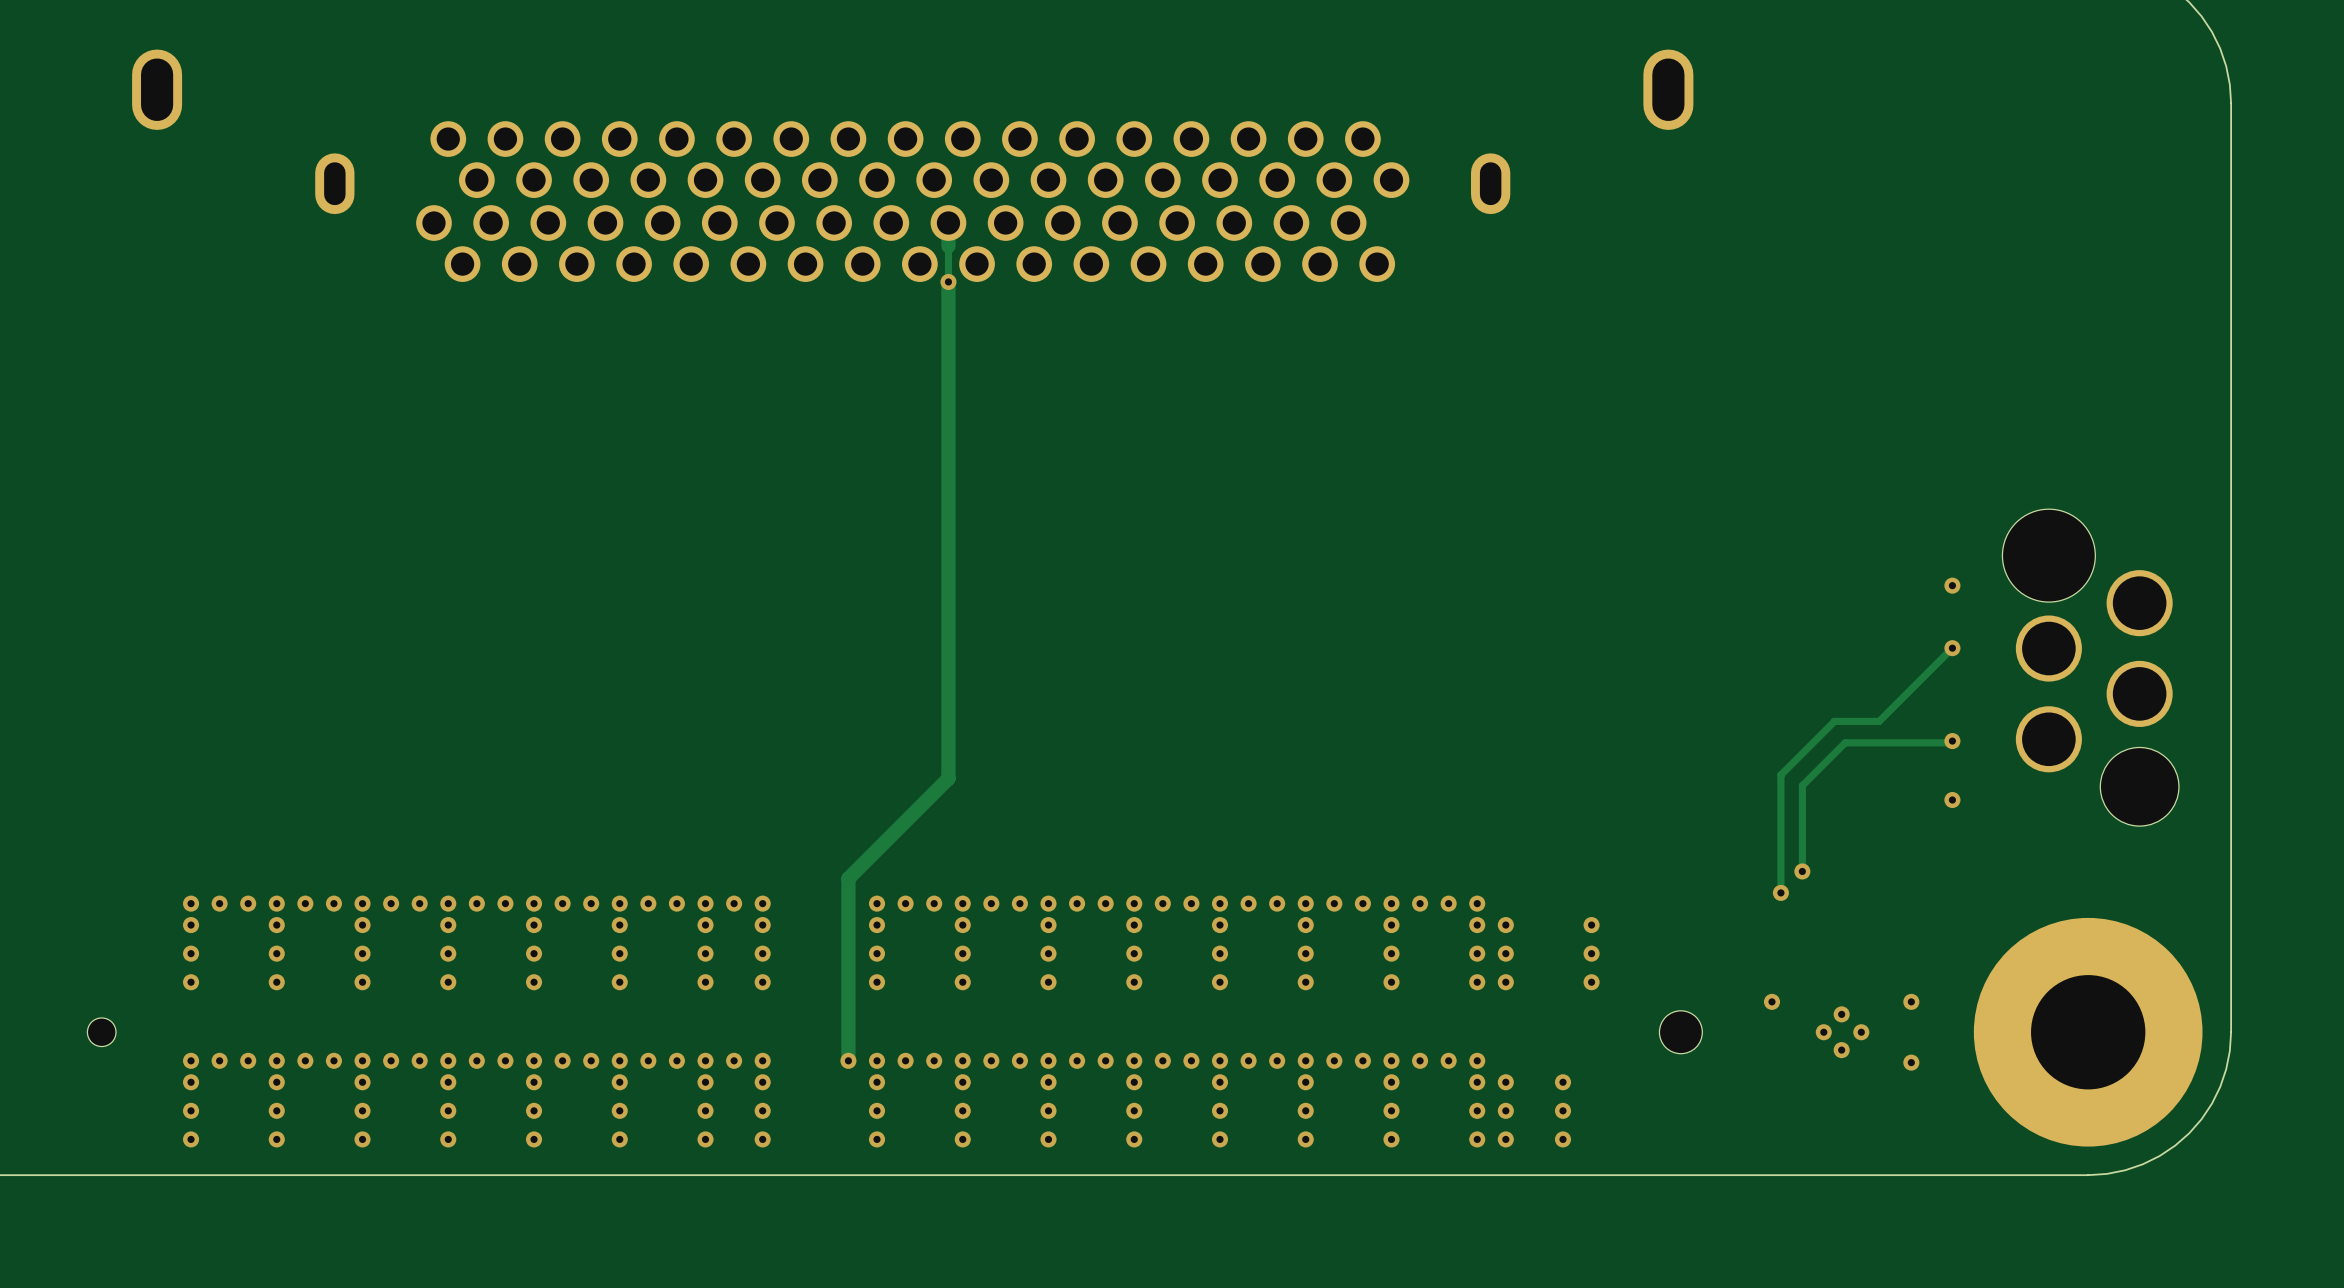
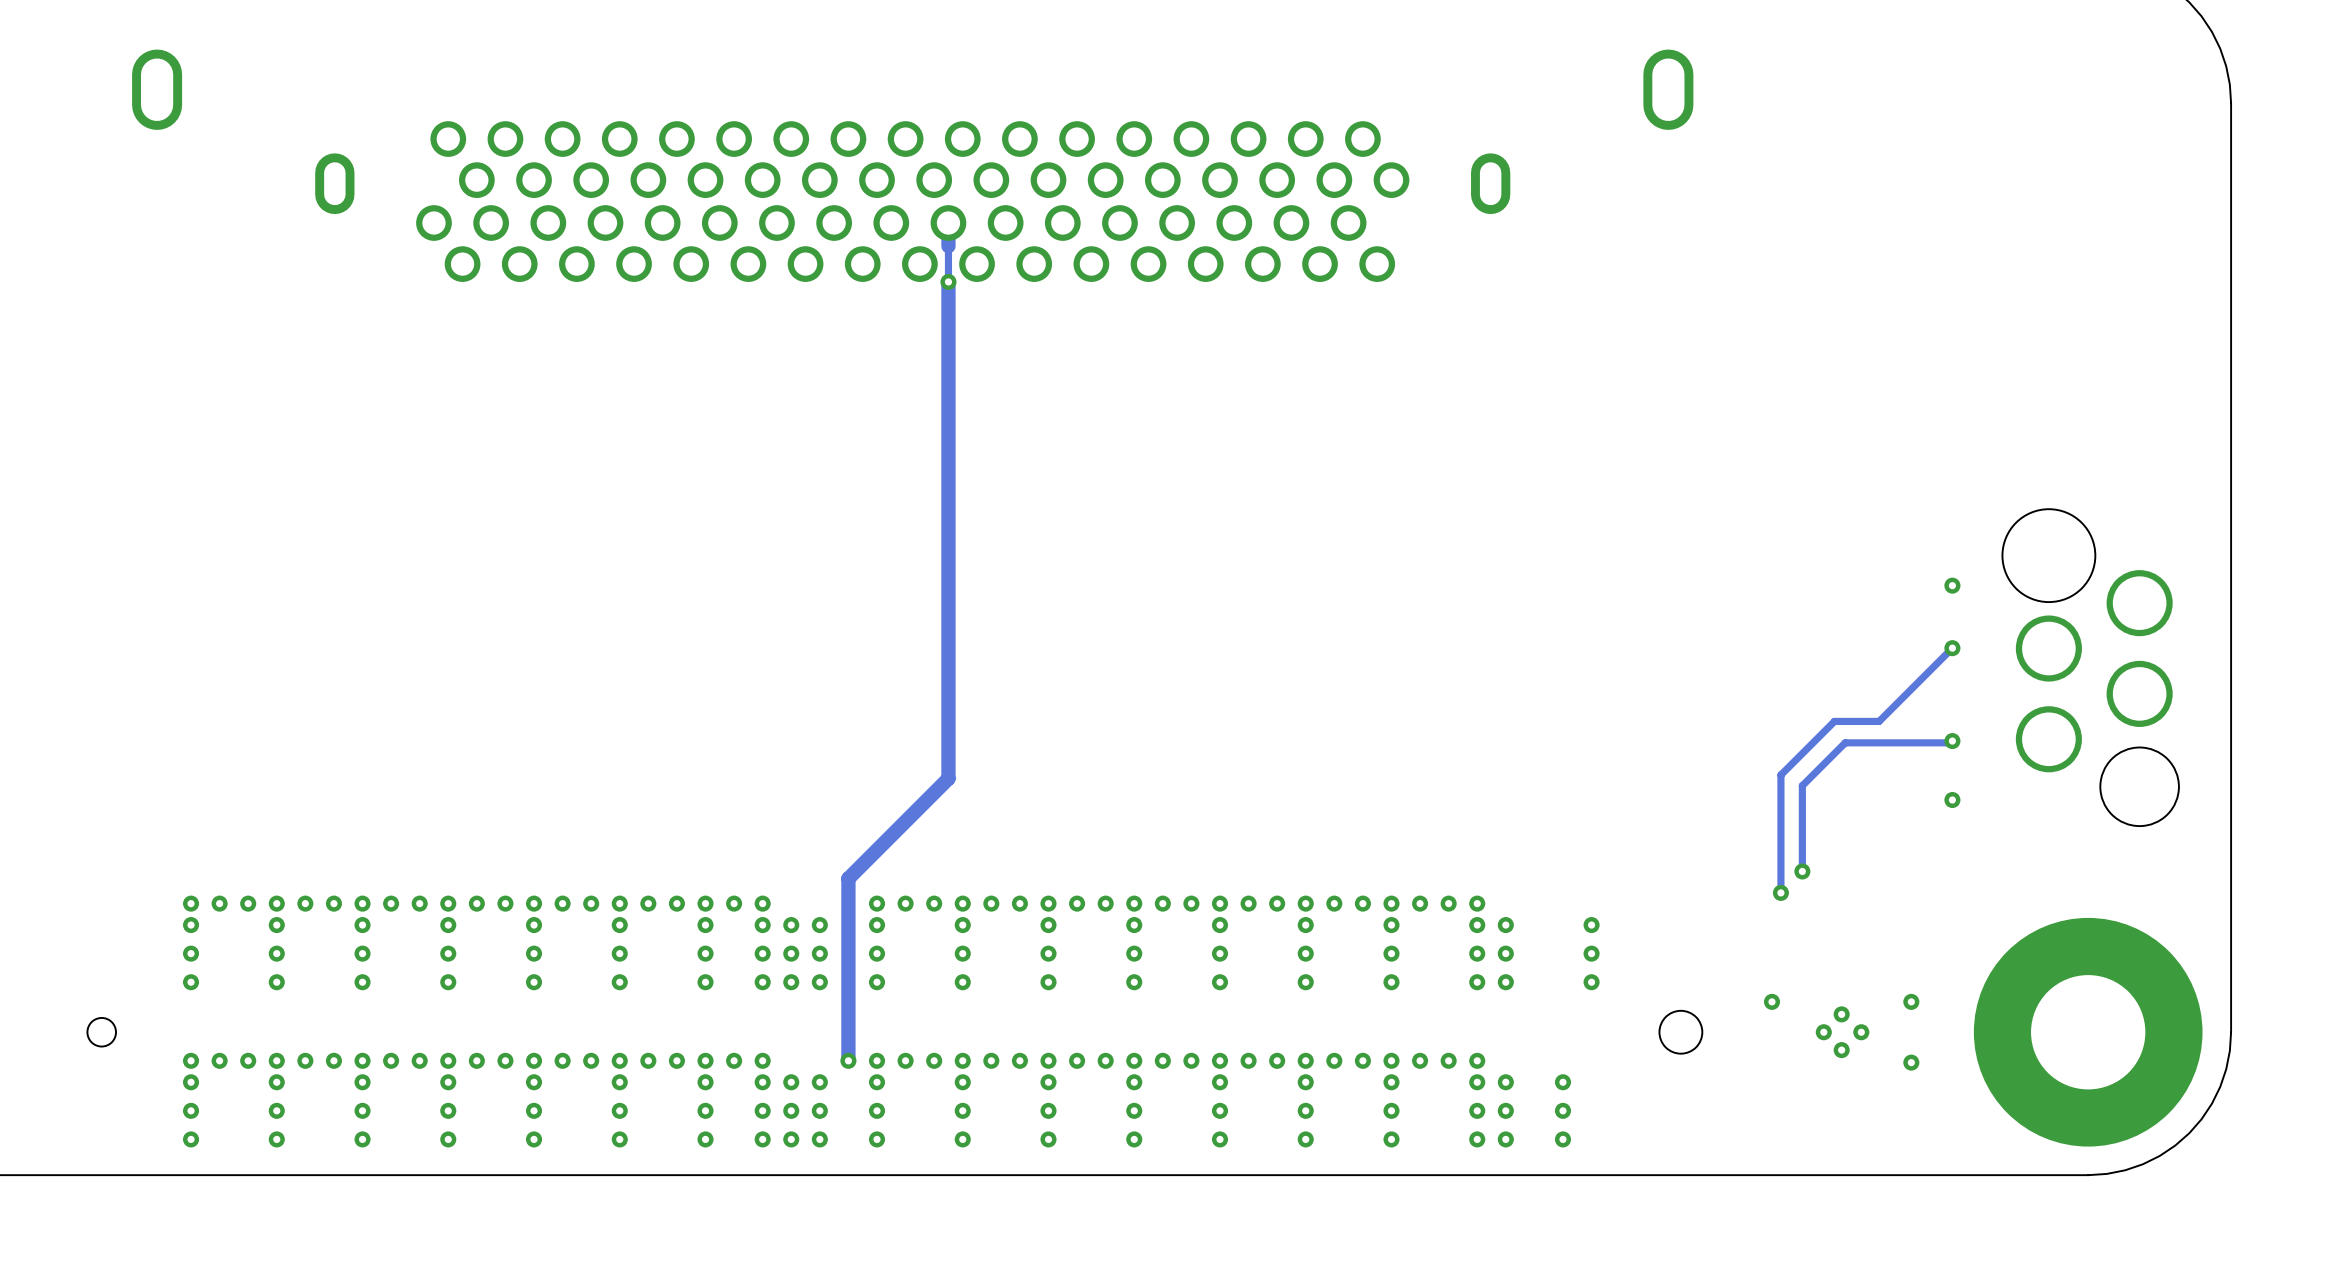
via: none -> (791, 925)
via: none -> (819, 925)
via: none -> (791, 953)
via: none -> (819, 953)
via: none -> (791, 982)
via: none -> (819, 982)
via: none -> (791, 1082)
via: none -> (819, 1082)
via: none -> (791, 1110)
via: none -> (819, 1110)
via: none -> (791, 1139)
via: none -> (819, 1139)

